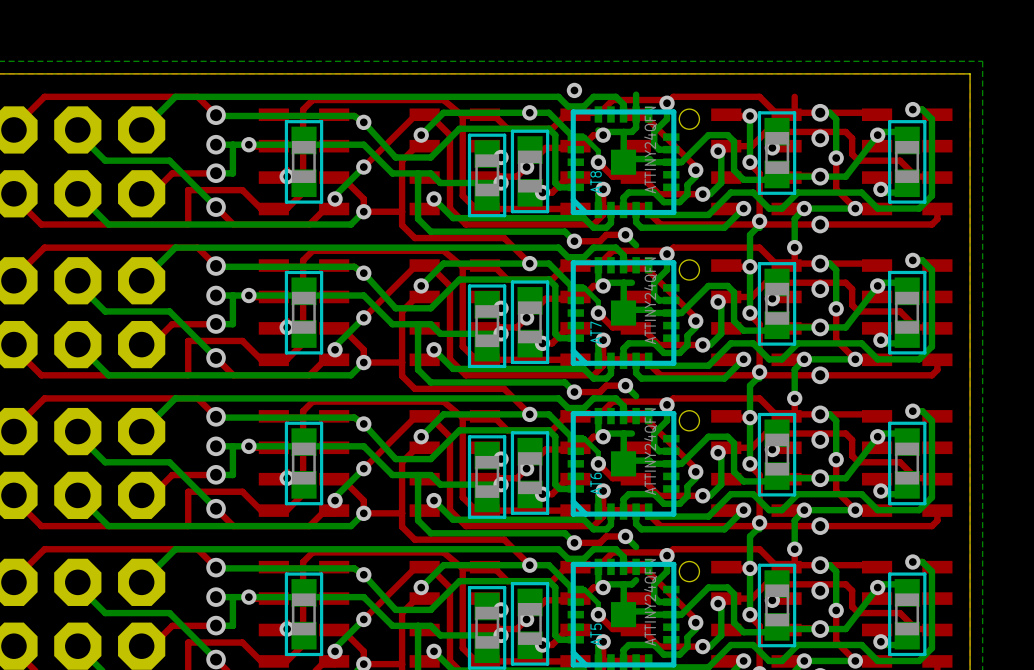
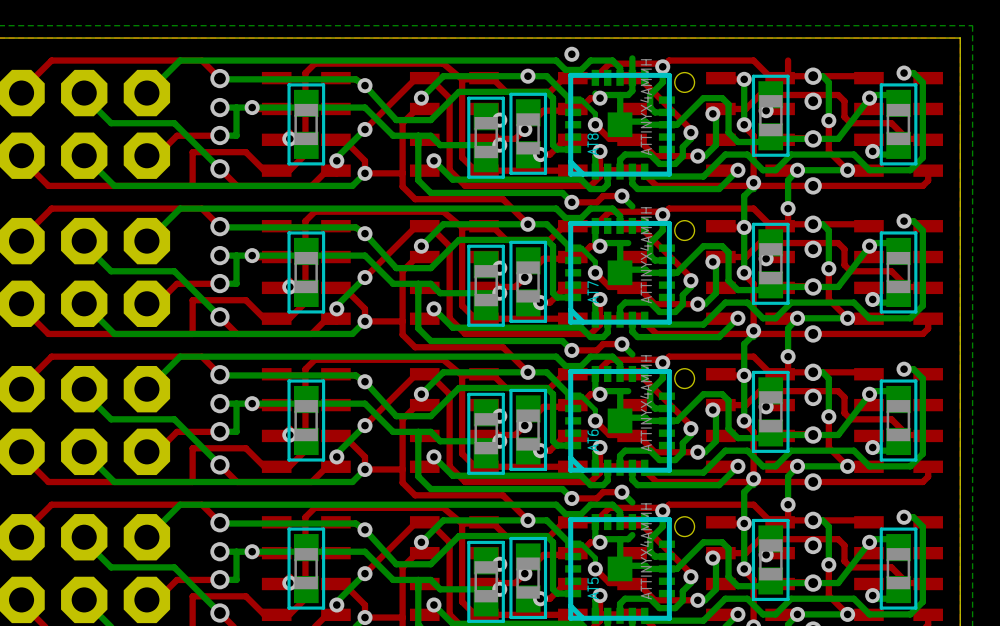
AT8 value: ATTINY24QFN (650, 150) -> ATTINYX4AMMH (646, 107)
AT7 value: ATTINY24QFN (650, 300) -> ATTINYX4AMMH (646, 255)
AT6 value: ATTINY24QFN (650, 451) -> ATTINYX4AMMH (646, 403)
AT5 value: ATTINY24QFN (650, 602) -> ATTINYX4AMMH (646, 551)

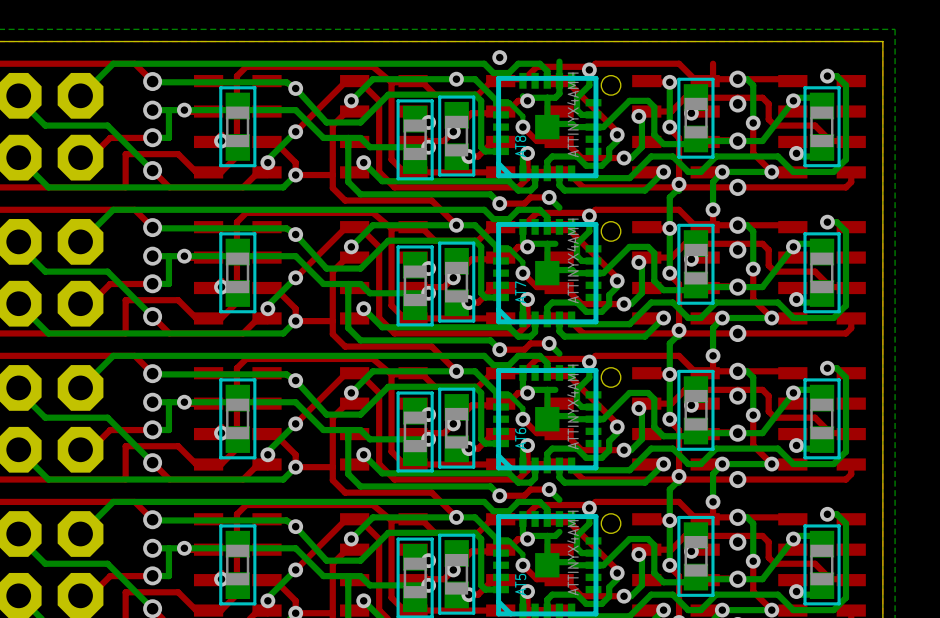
AT8 value: ATTINYX4AMMH (646, 107) -> ATTINYX4AMH (573, 114)
AT7 value: ATTINYX4AMMH (646, 255) -> ATTINYX4AMH (573, 260)
AT6 value: ATTINYX4AMMH (646, 403) -> ATTINYX4AMH (573, 406)
AT5 value: ATTINYX4AMMH (646, 551) -> ATTINYX4AMH (573, 553)

